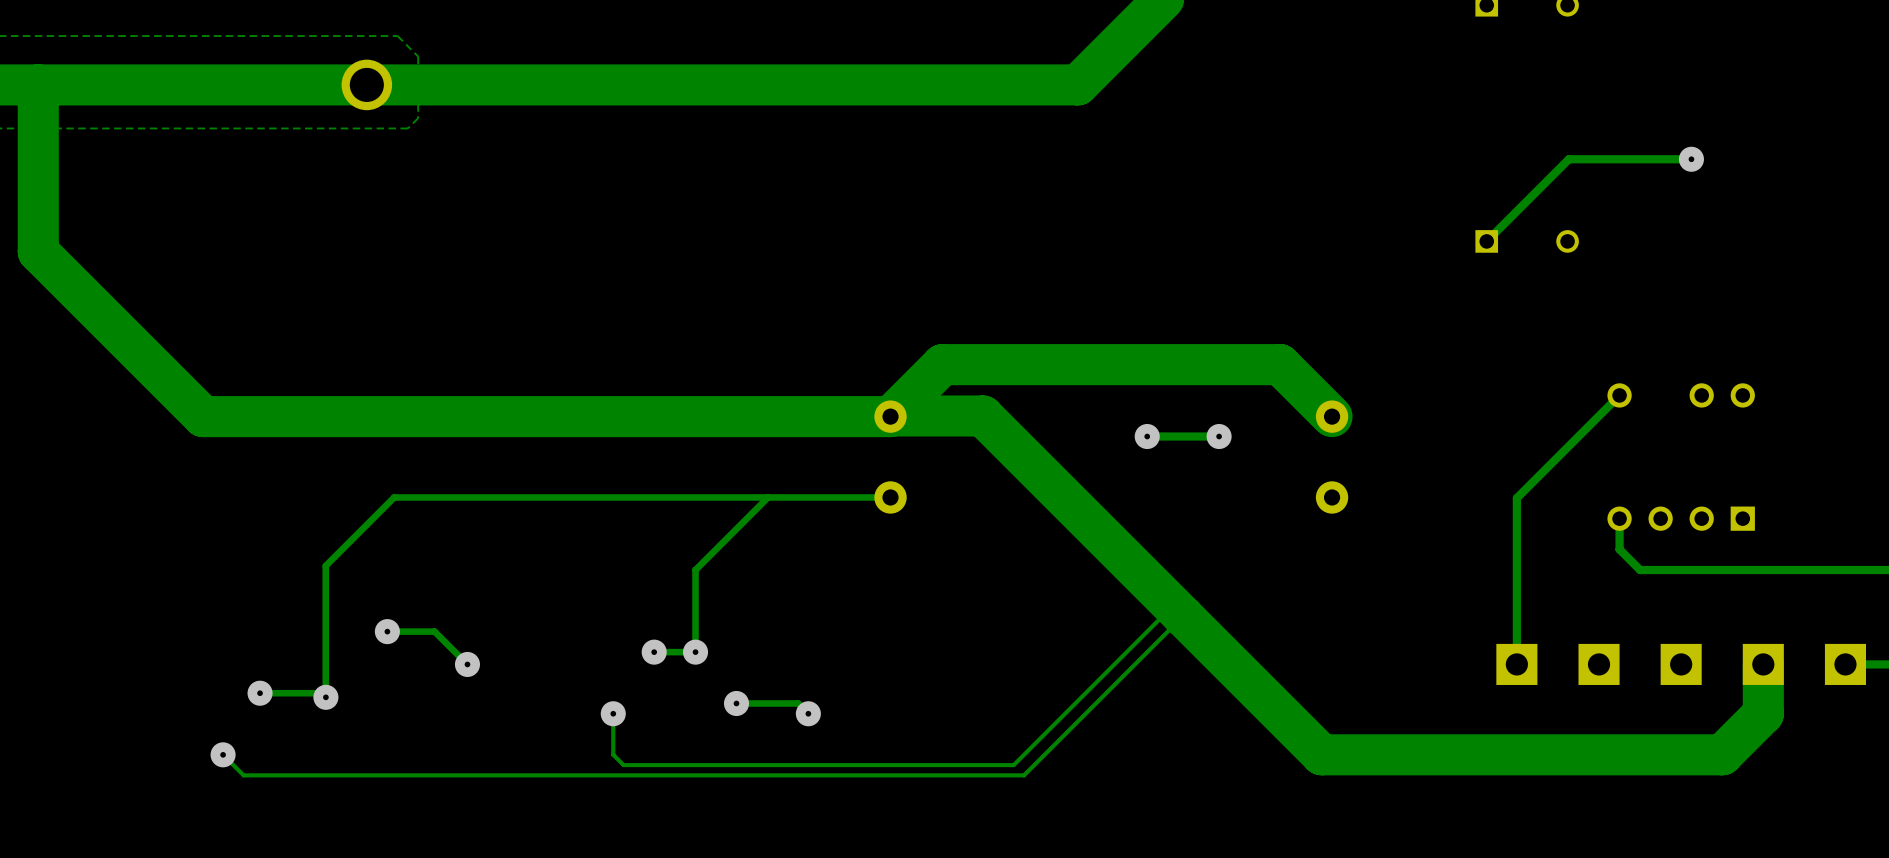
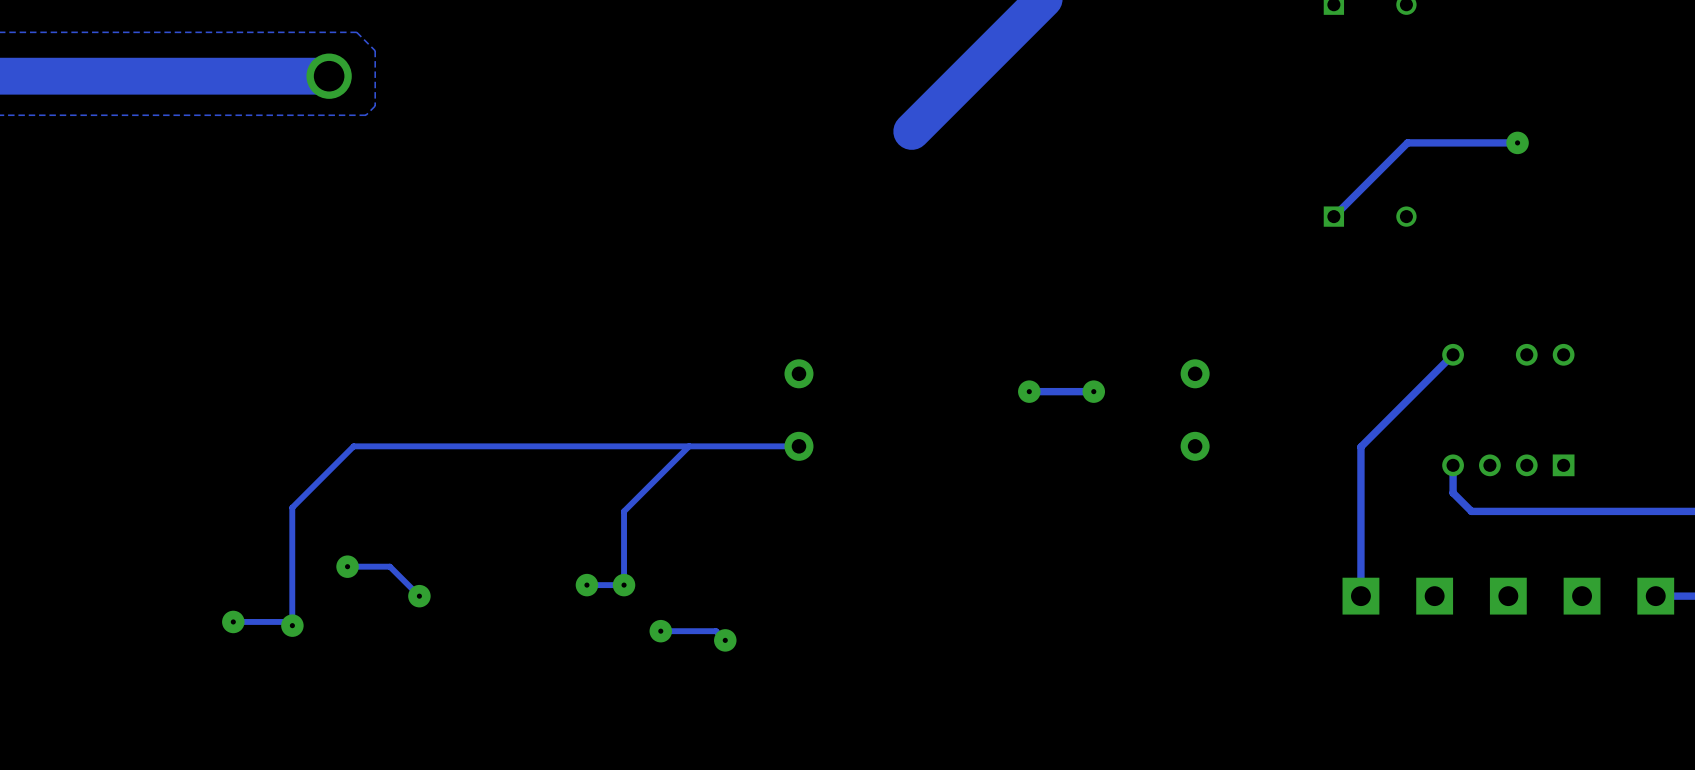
track: (38, 84) (38, 251) (203, 416) (890, 416) (942, 364) (1280, 364) (1332, 416) -> none
track: (1077, 84) (366, 84) -> (967, 76) (911, 131)
track: (891, 415) (982, 415) (1321, 754) (1722, 754) (1763, 713) (1763, 664) -> none
track: (1167, 611) (1013, 765) (623, 765) (613, 754) (613, 713) -> none
track: (1183, 616) (1024, 775) (243, 775) (223, 754) -> none
via: (613, 713) -> none
via: (223, 754) -> none

